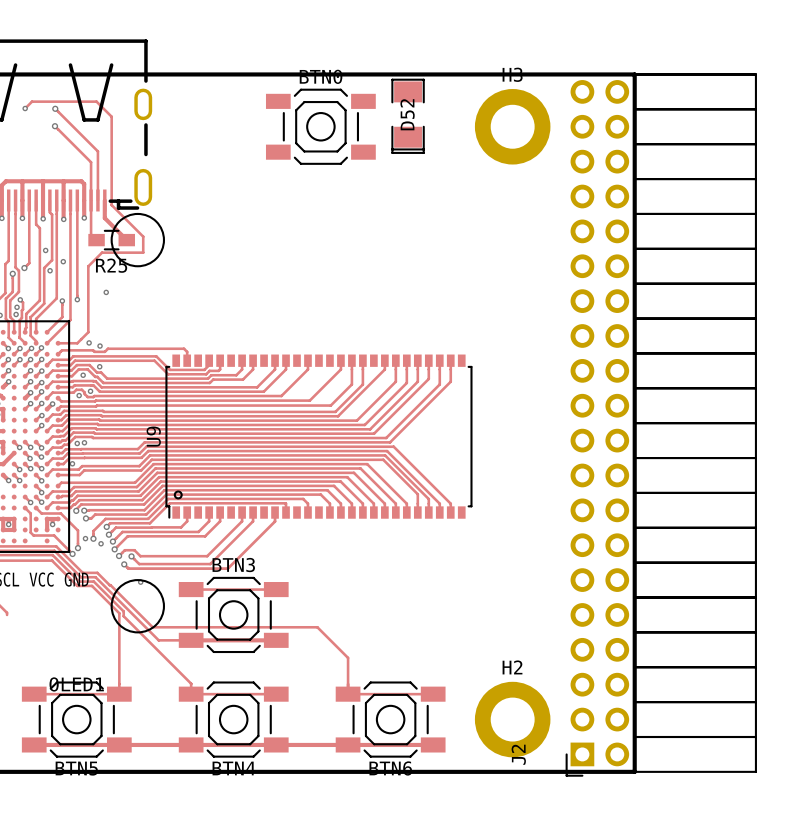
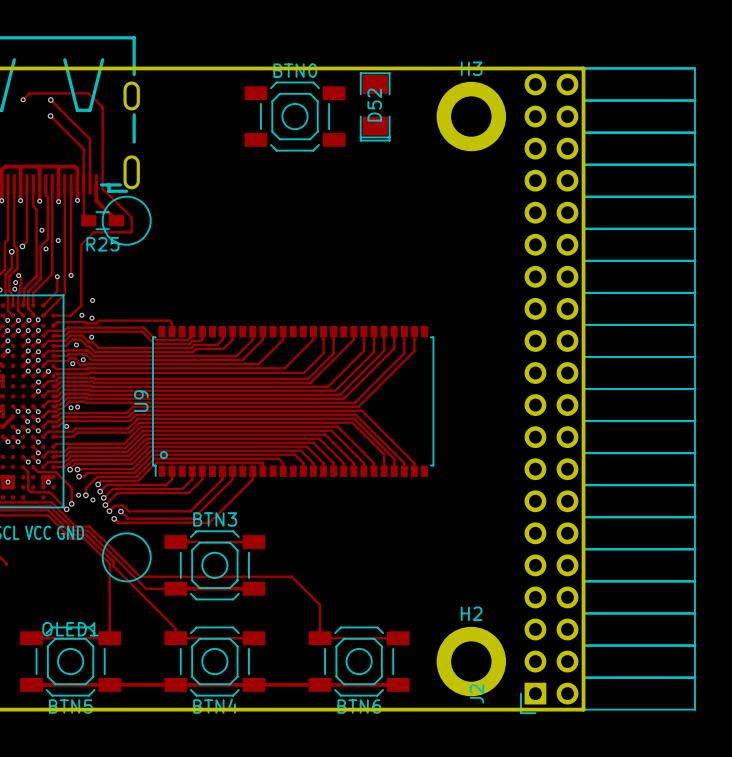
via position: (106, 292) -> (92, 300)
via: (140, 582) -> none

